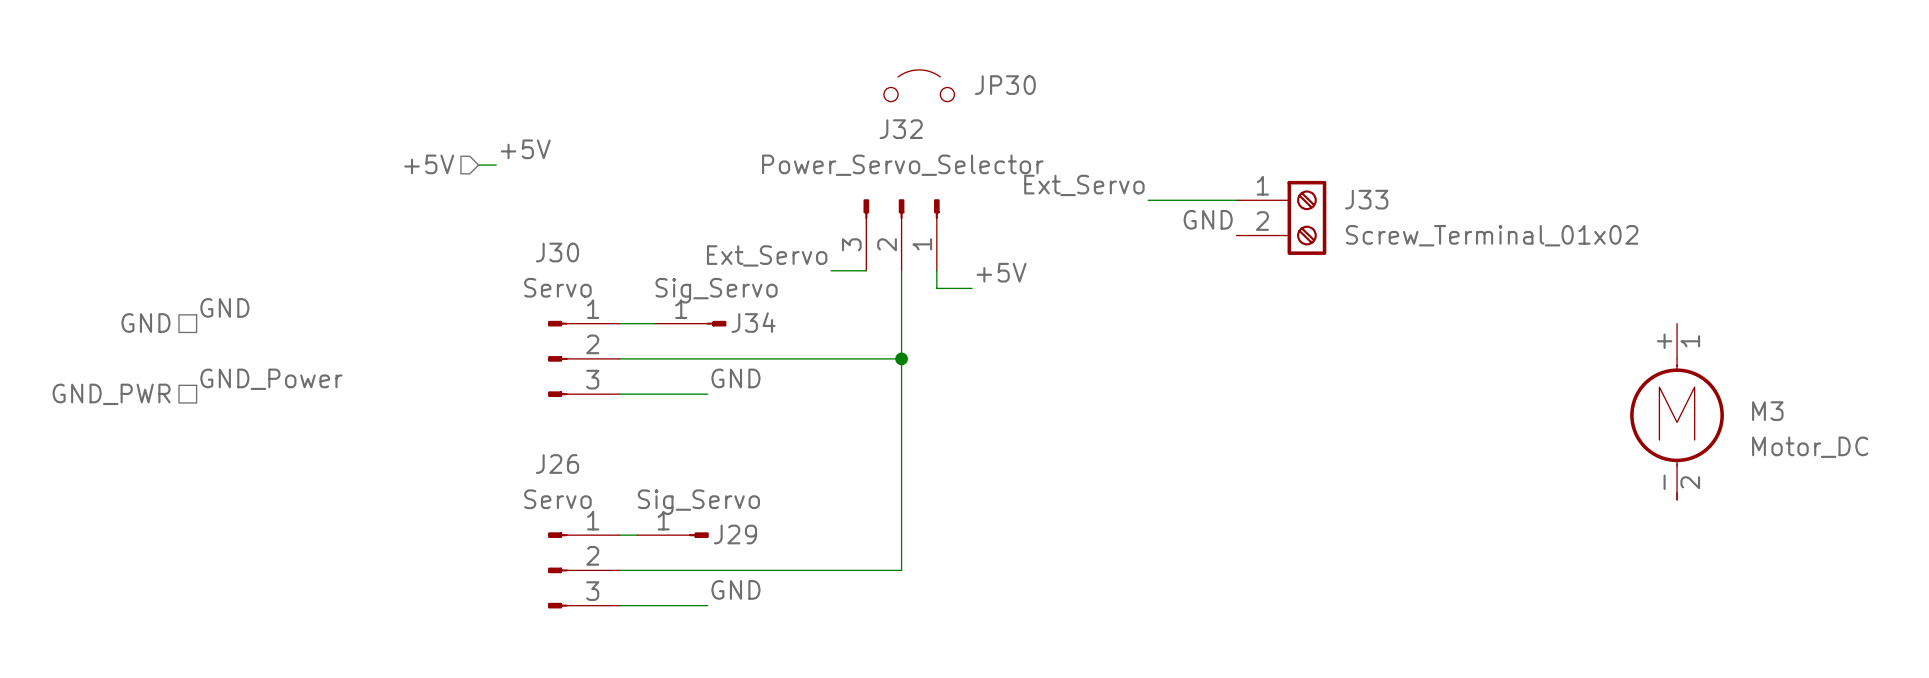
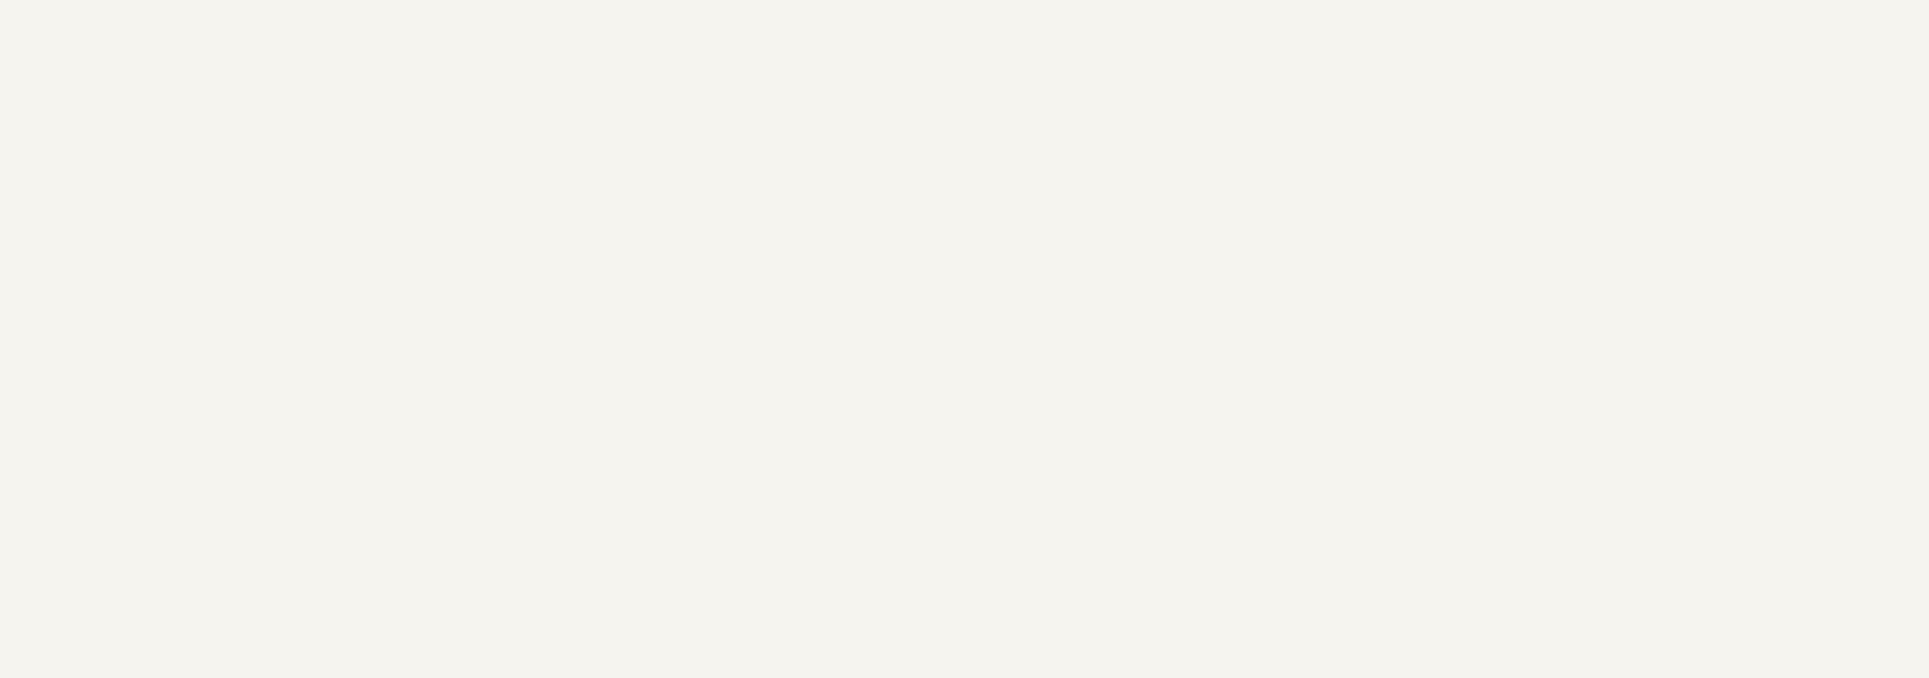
JP30: (919, 85) -> none
label: +5V (525, 149) -> none
hierarchical label: +5V (429, 164) -> none
wire: (478, 165) (496, 165) -> none
label: Ext_Servo (1084, 185) -> none
wire: (1148, 200) (1236, 200) -> none
J33: Screw_Terminal_01x02 (1281, 217) -> none
label: GND (1208, 219) -> none
J32: Power_Servo_Selector (901, 235) -> none
label: Ext_Servo (767, 255) -> none
wire: (831, 270) (866, 270) -> none
wire: (901, 270) (901, 570) (619, 570) -> none
wire: (936, 270) (936, 288) (972, 288) -> none
label: +5V (1001, 272) -> none
label: GND (224, 307) -> none
hierarchical label: GND (145, 323) -> none
wire: (619, 323) (654, 323) -> none
J34: Sig_Servo (690, 323) -> none
J30: Servo (583, 358) -> none
wire: (619, 358) (901, 358) -> none
junction: (901, 358) -> none
label: GND (735, 378) -> none
label: GND_Power (271, 379) -> none
hierarchical label: GND_PWR (111, 394) -> none
wire: (619, 394) (707, 394) -> none
M3: Motor_DC (1677, 411) -> none
wire: (619, 535) (637, 535) -> none
J29: Sig_Servo (672, 535) -> none
J26: Servo (583, 570) -> none
label: GND (735, 589) -> none
wire: (619, 605) (707, 605) -> none

